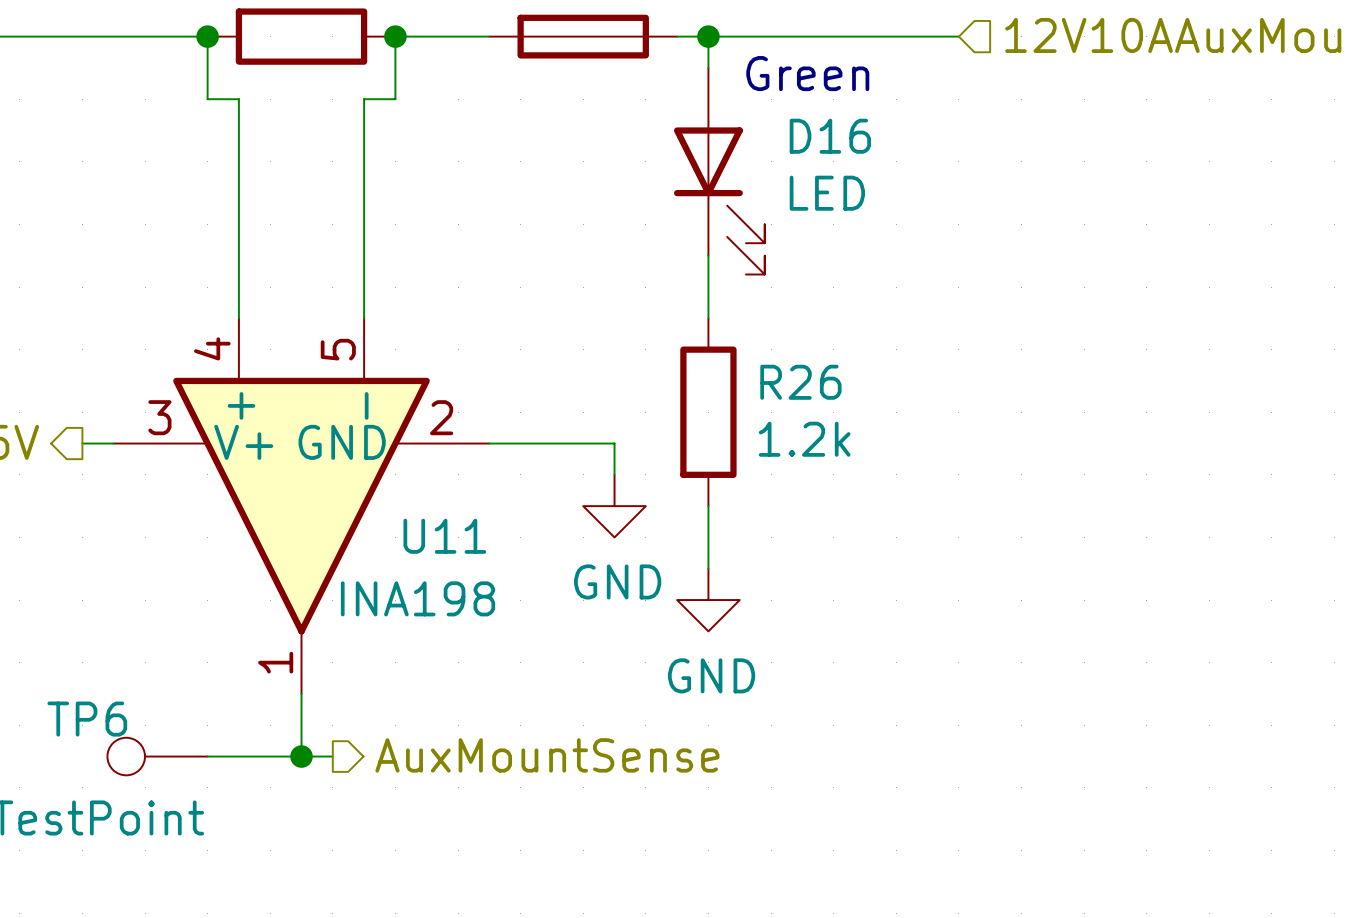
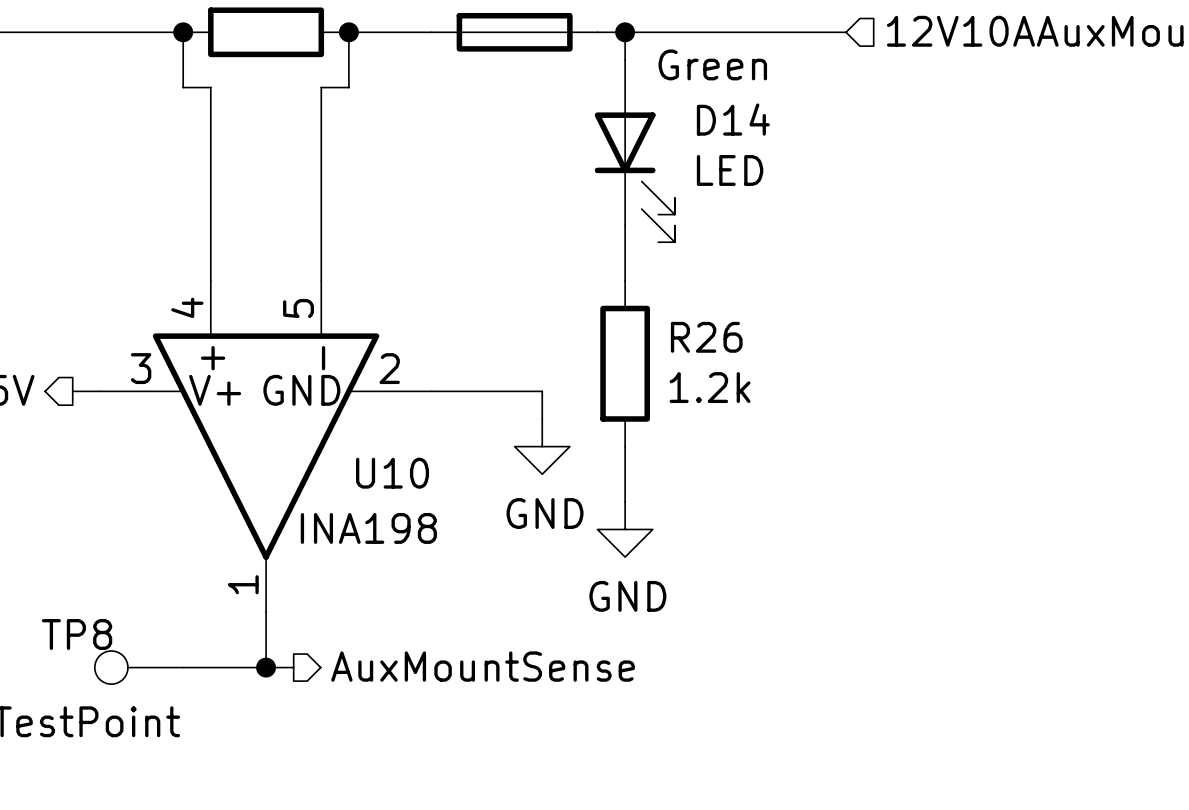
D16 name: D16 (830, 136) -> D14 (733, 119)
U11 name: U11 (444, 536) -> U10 (392, 473)
TP6 name: TP6 (87, 719) -> TP8 (77, 634)

